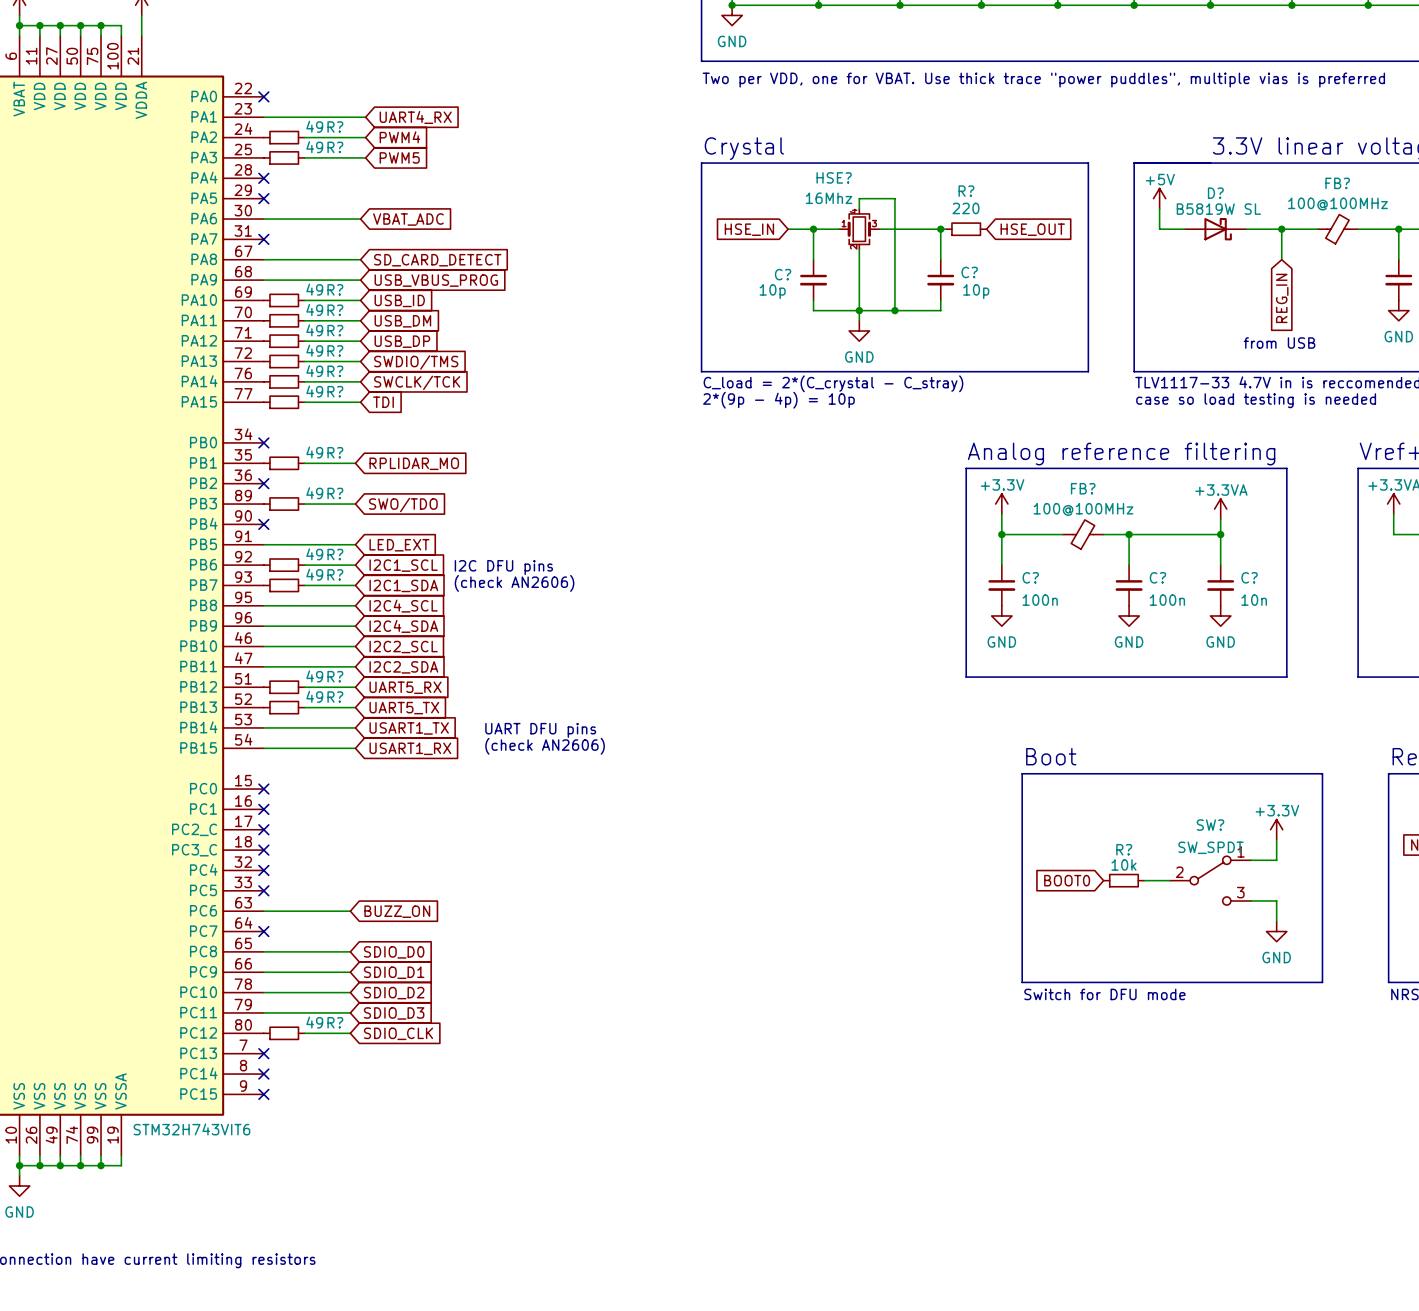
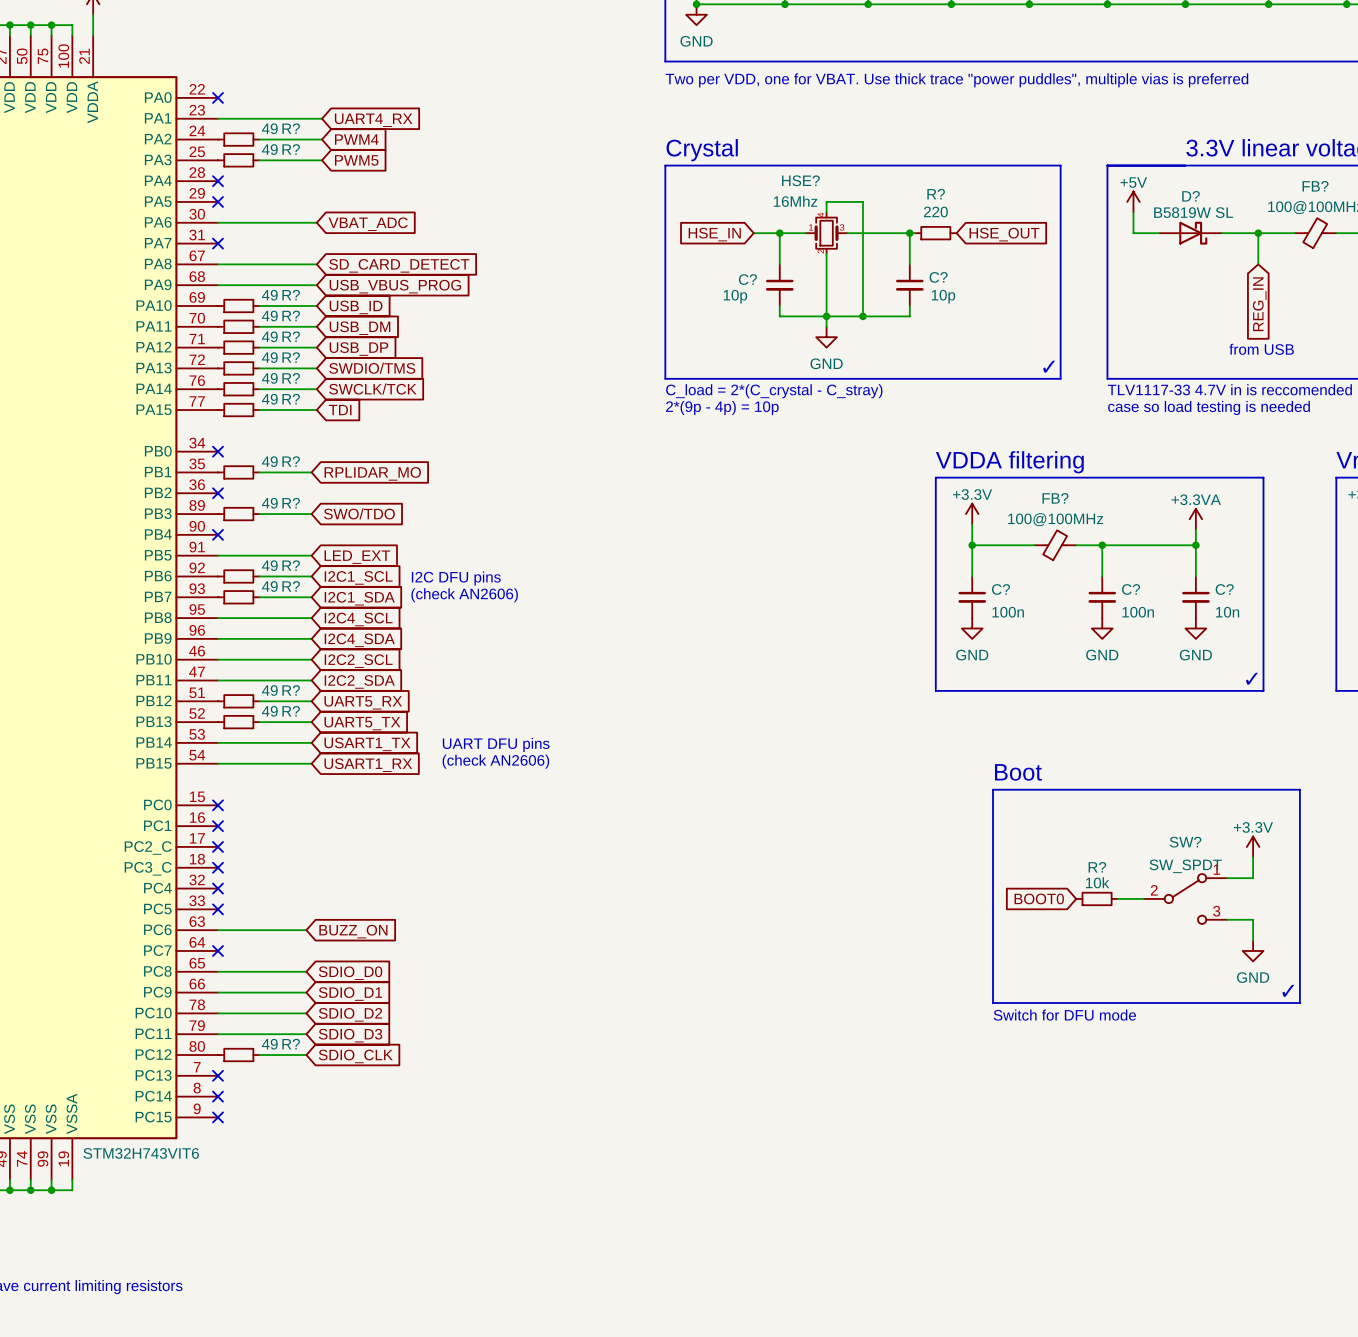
text: none -> ✓ (1049, 366)
text: Analog reference filtering (1121, 454) -> VDDA filtering (1009, 462)
text: none -> ✓ (1251, 678)
text: none -> ✓ (1288, 990)

